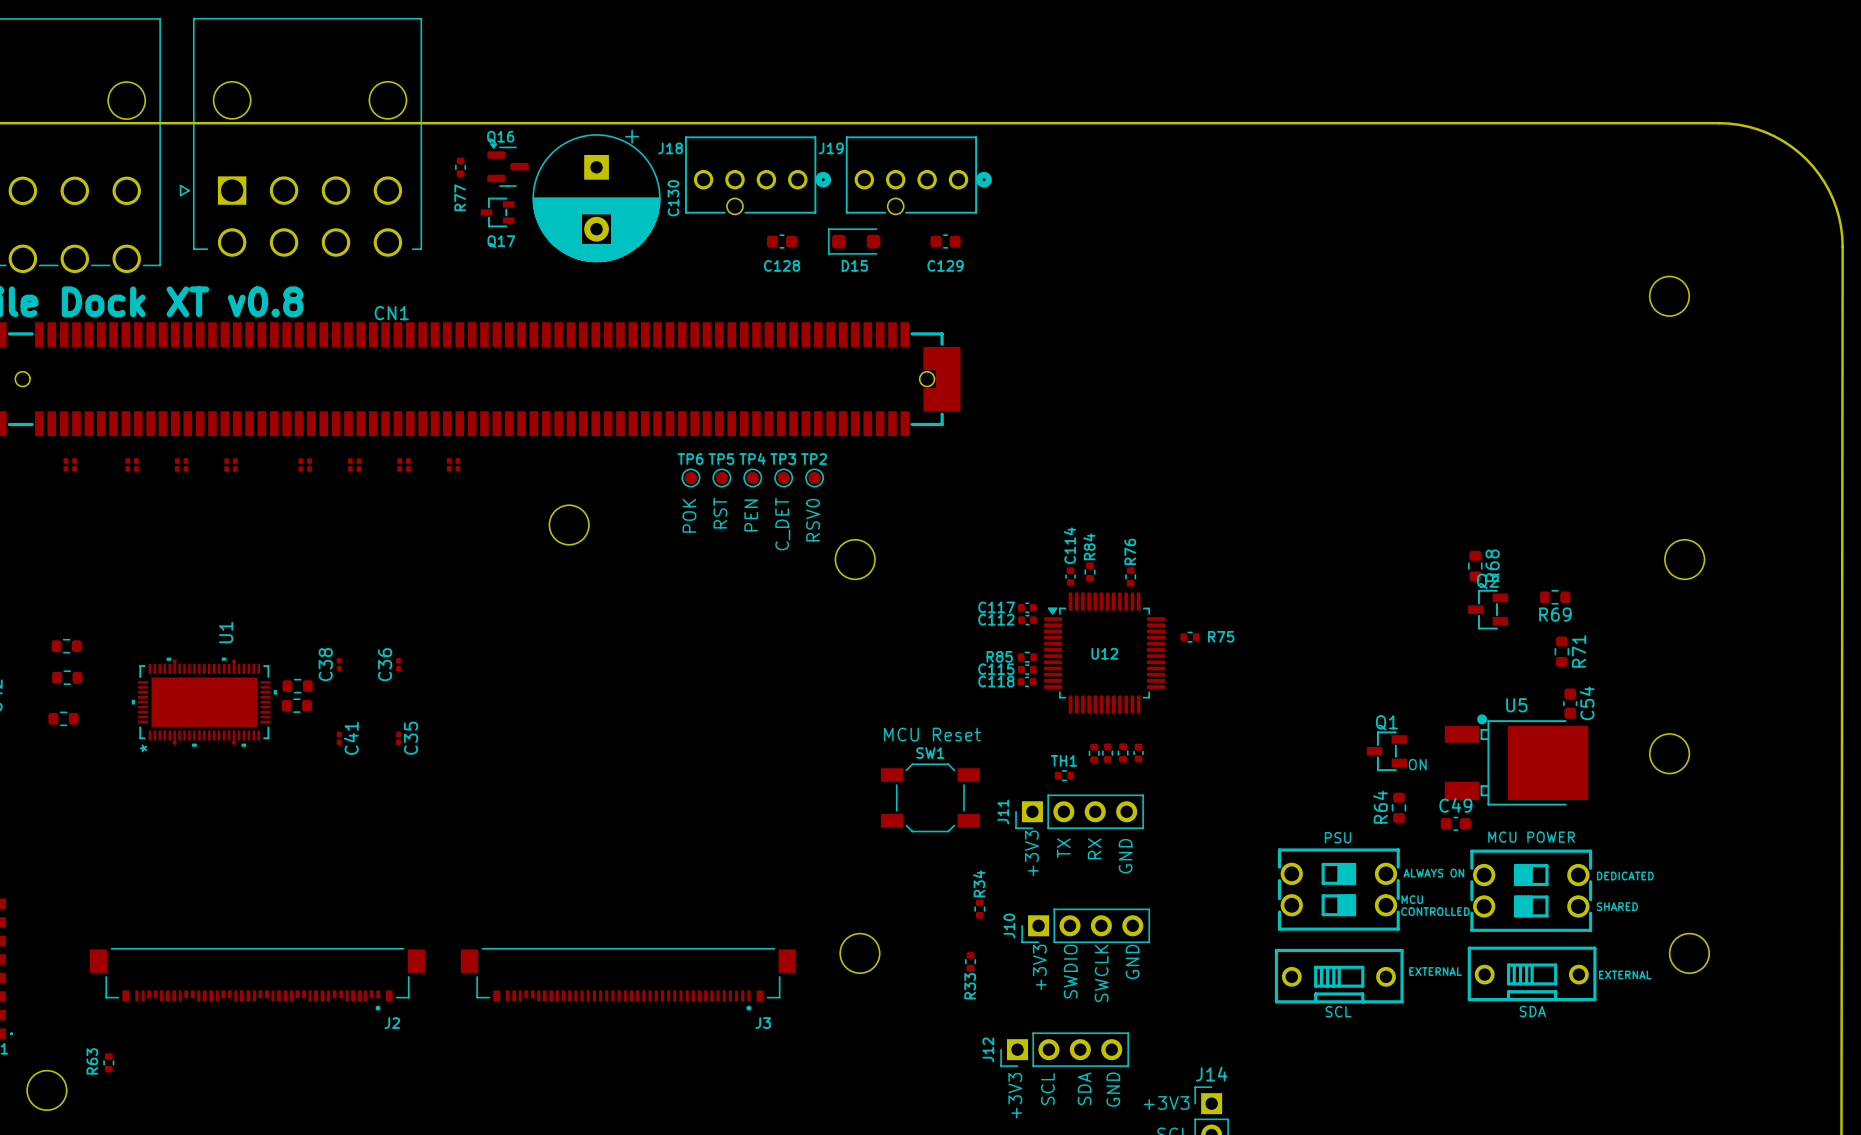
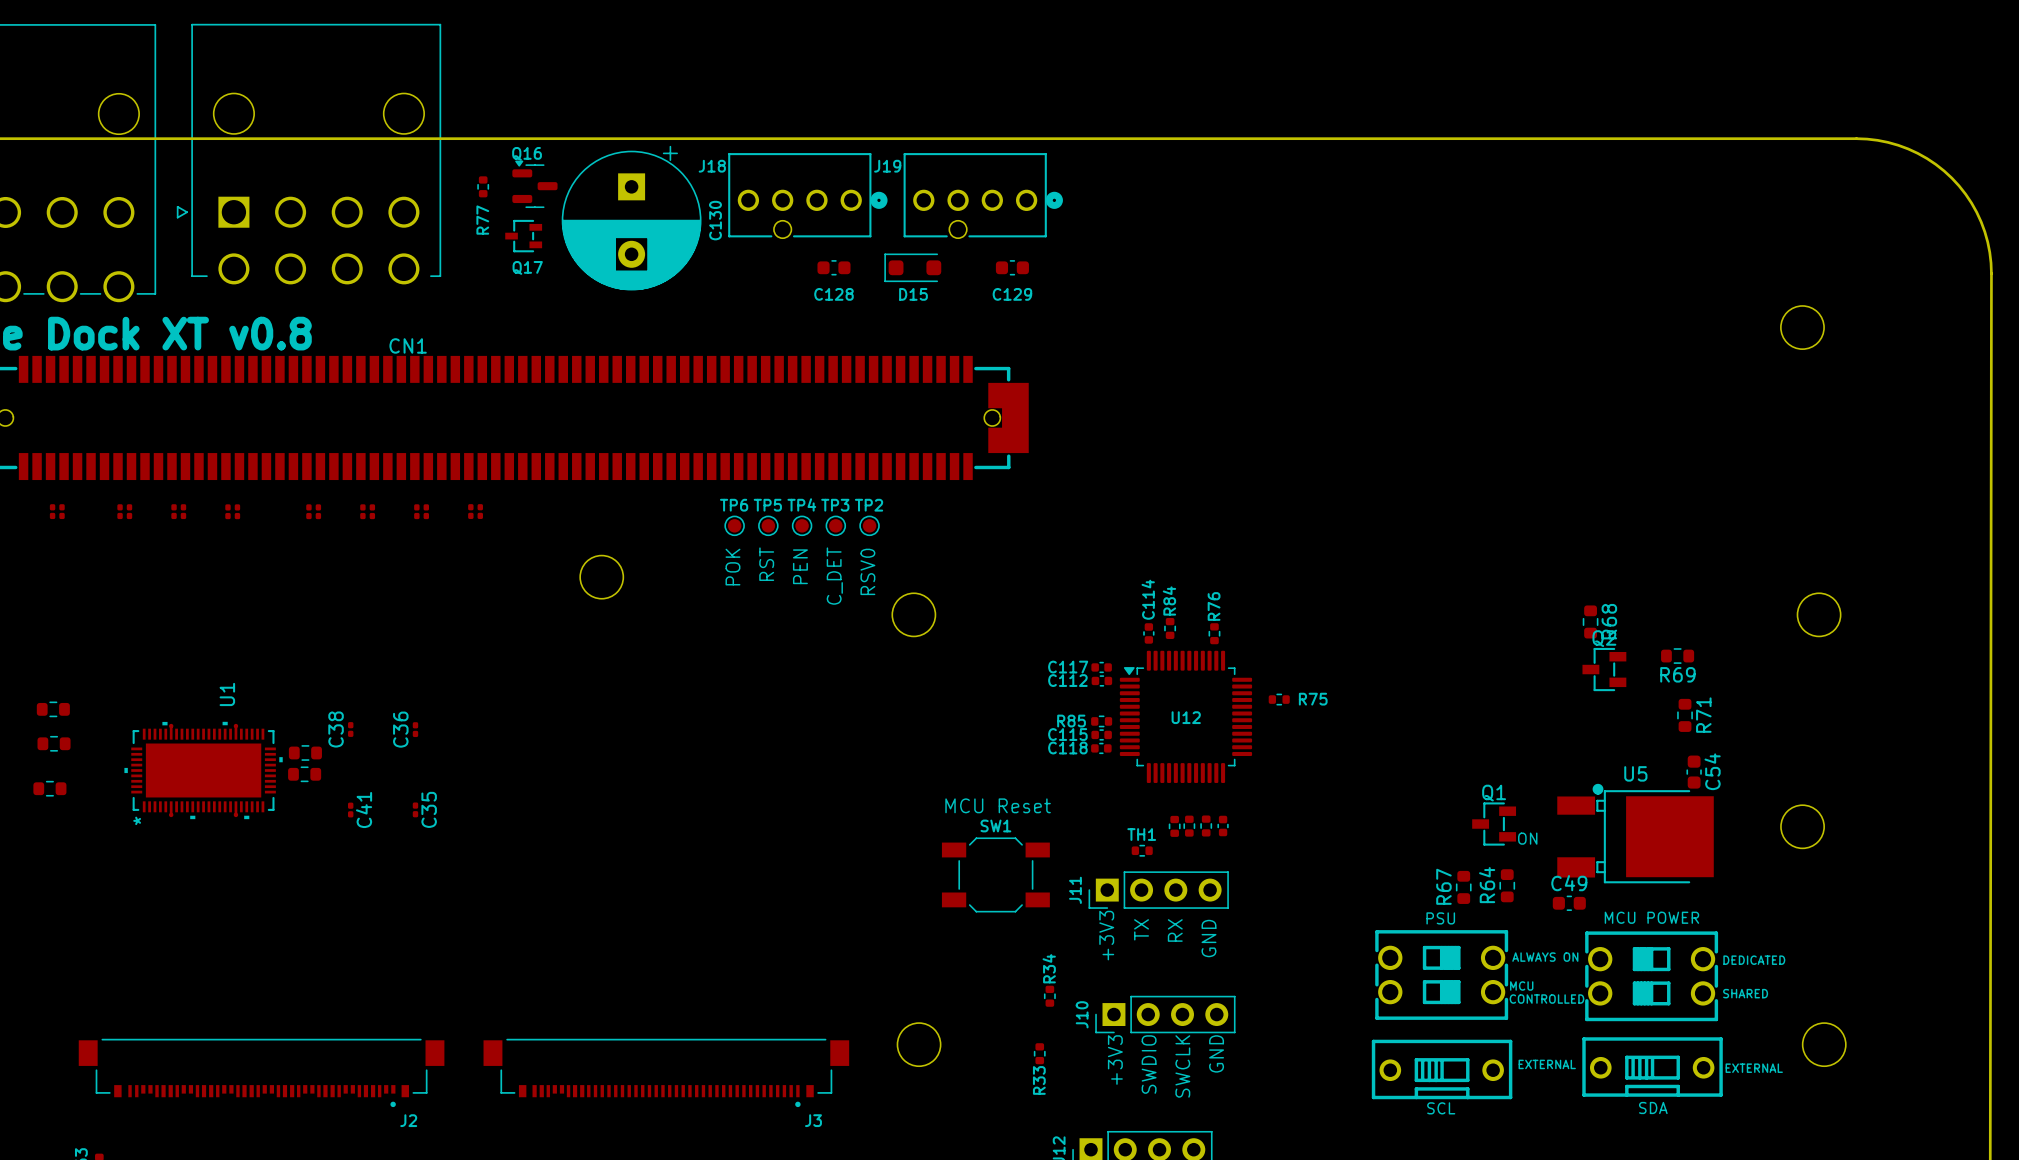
R67: none -> (1463, 887)

